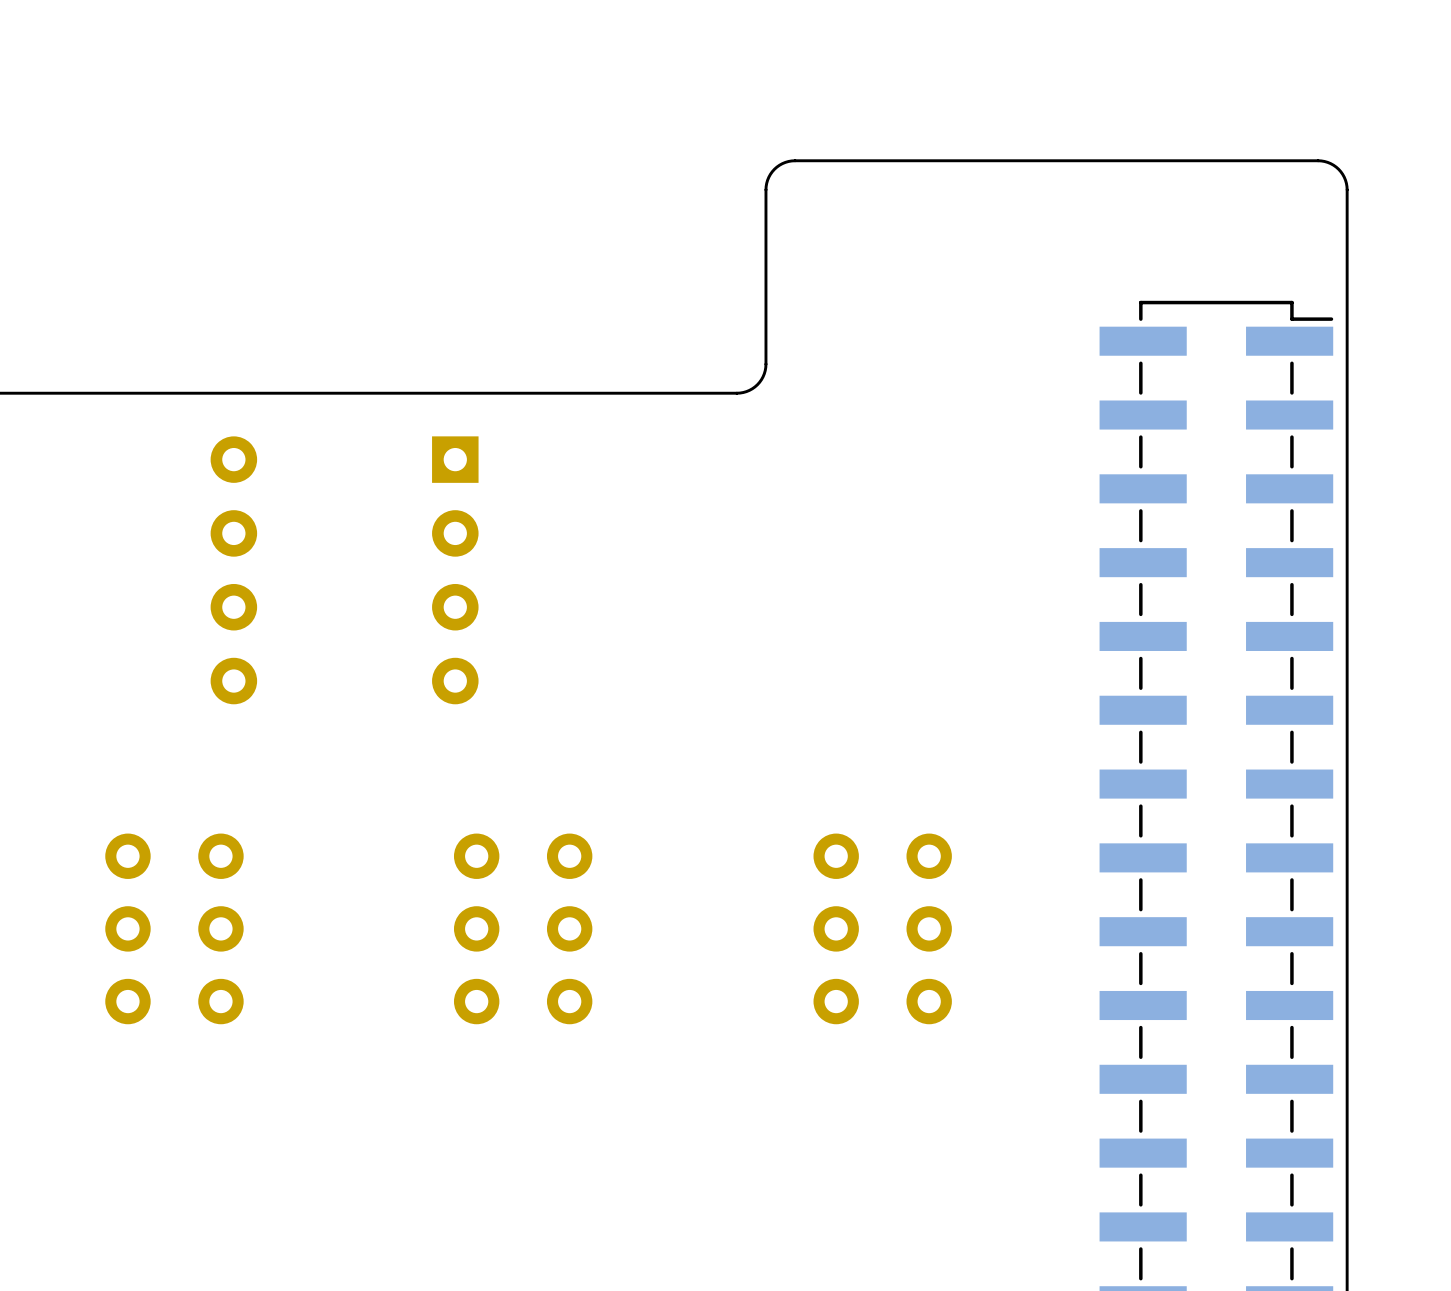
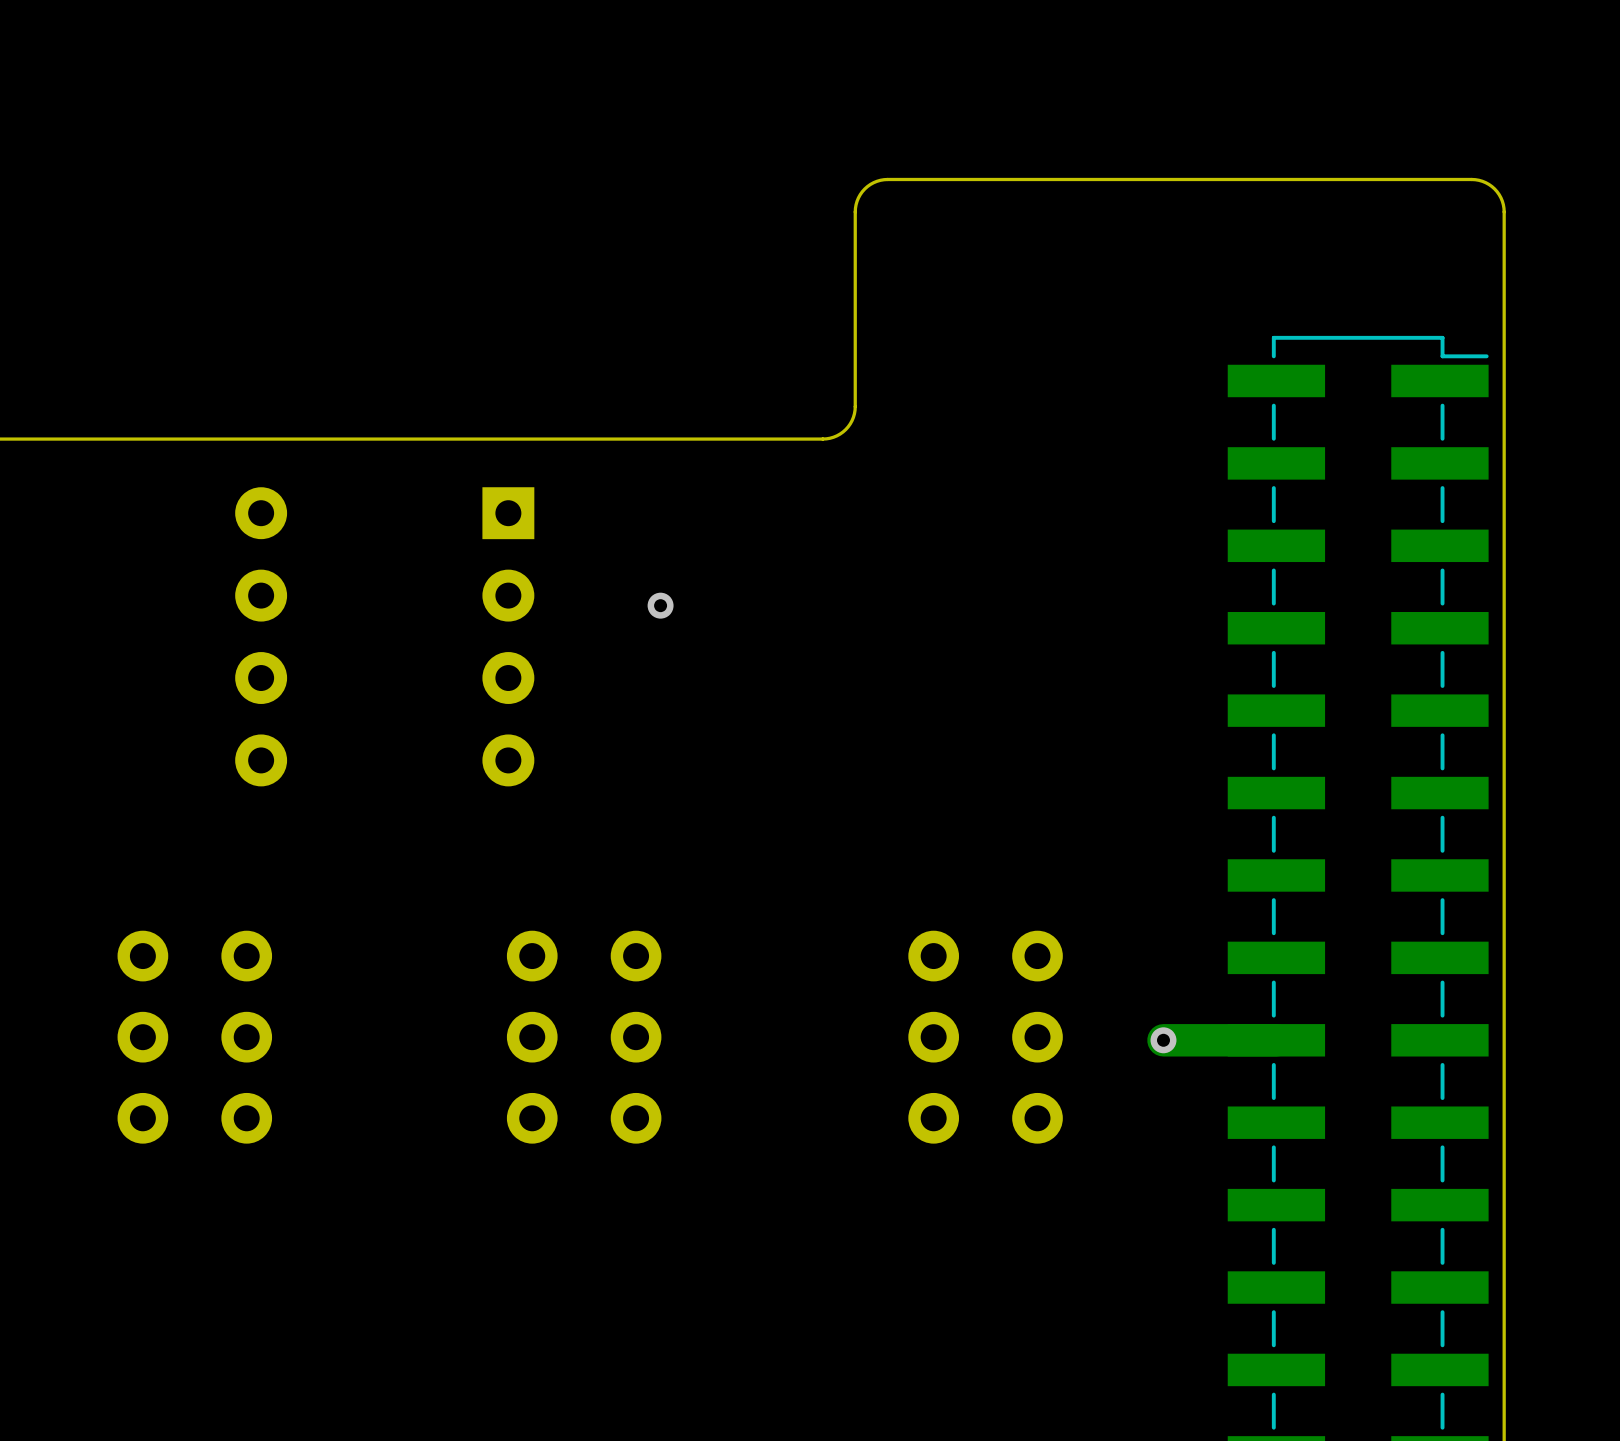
via: none -> (660, 605)
via: none -> (1163, 1040)
track: none -> (1276, 1040) (1163, 1040)

